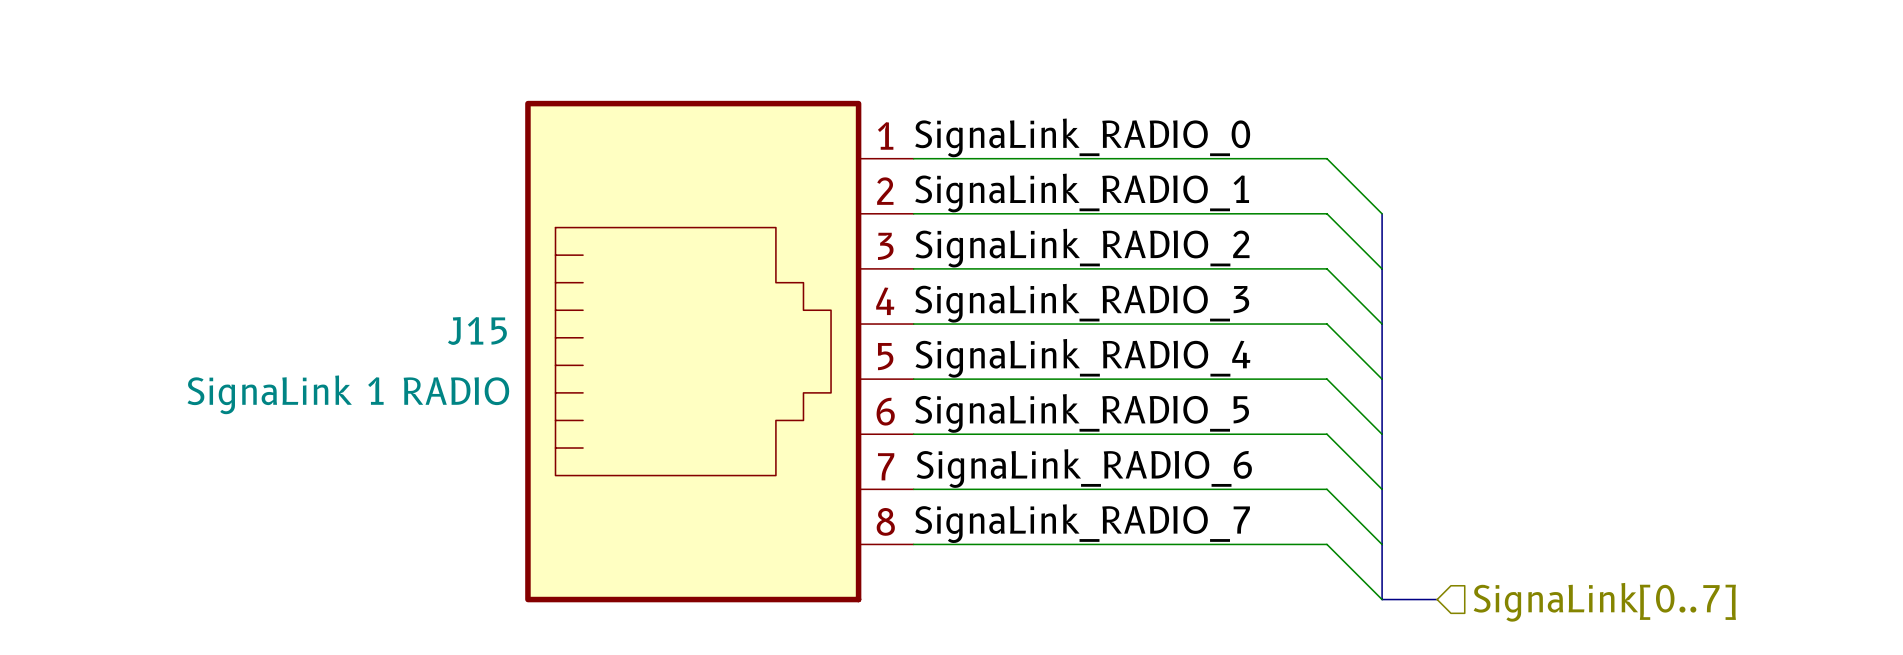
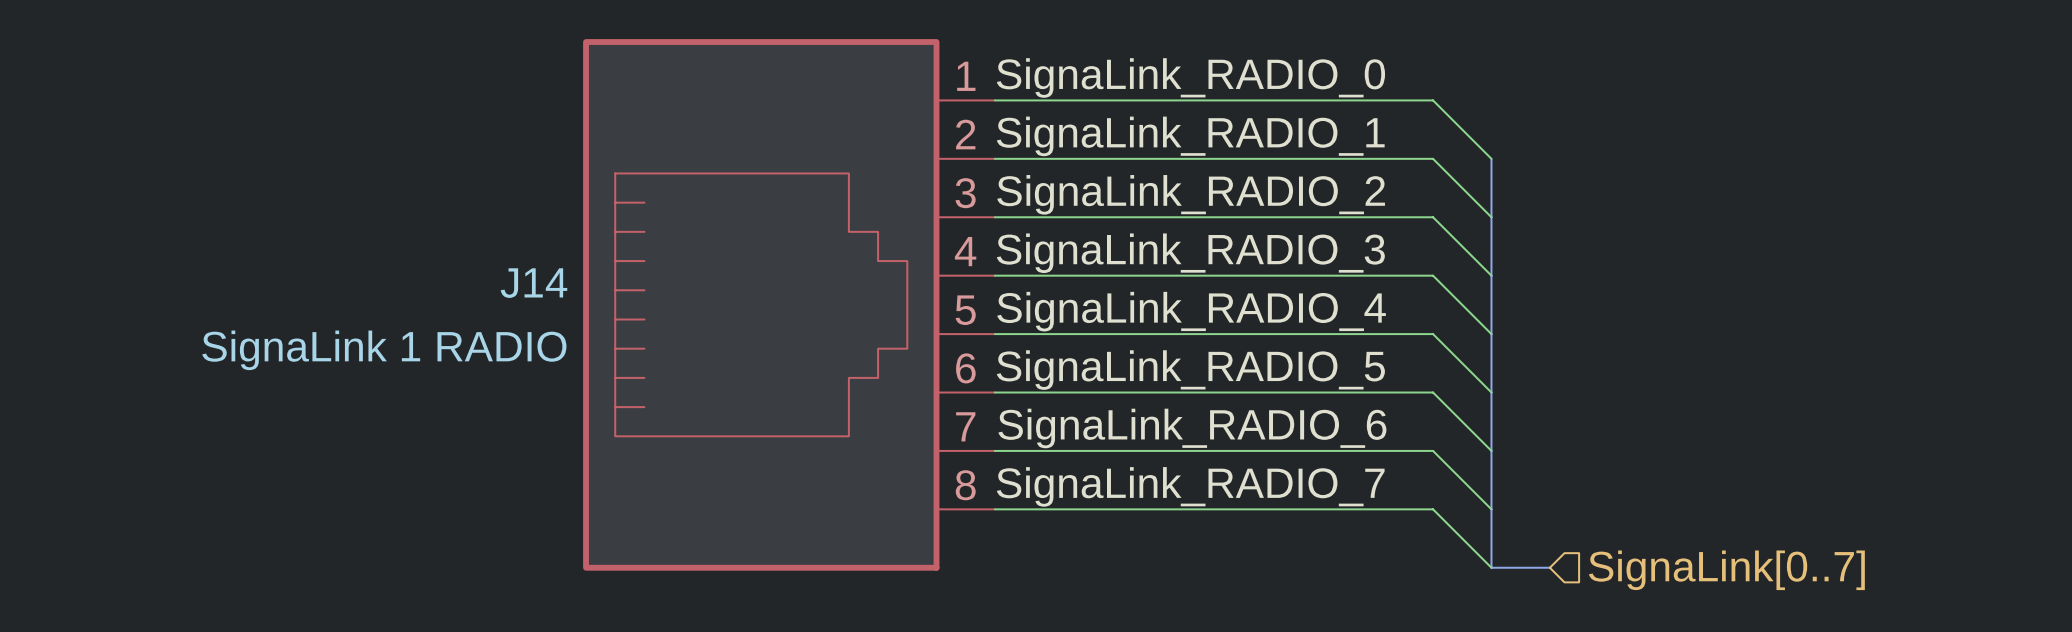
J15 name: J15 (477, 330) -> J14 (533, 283)

